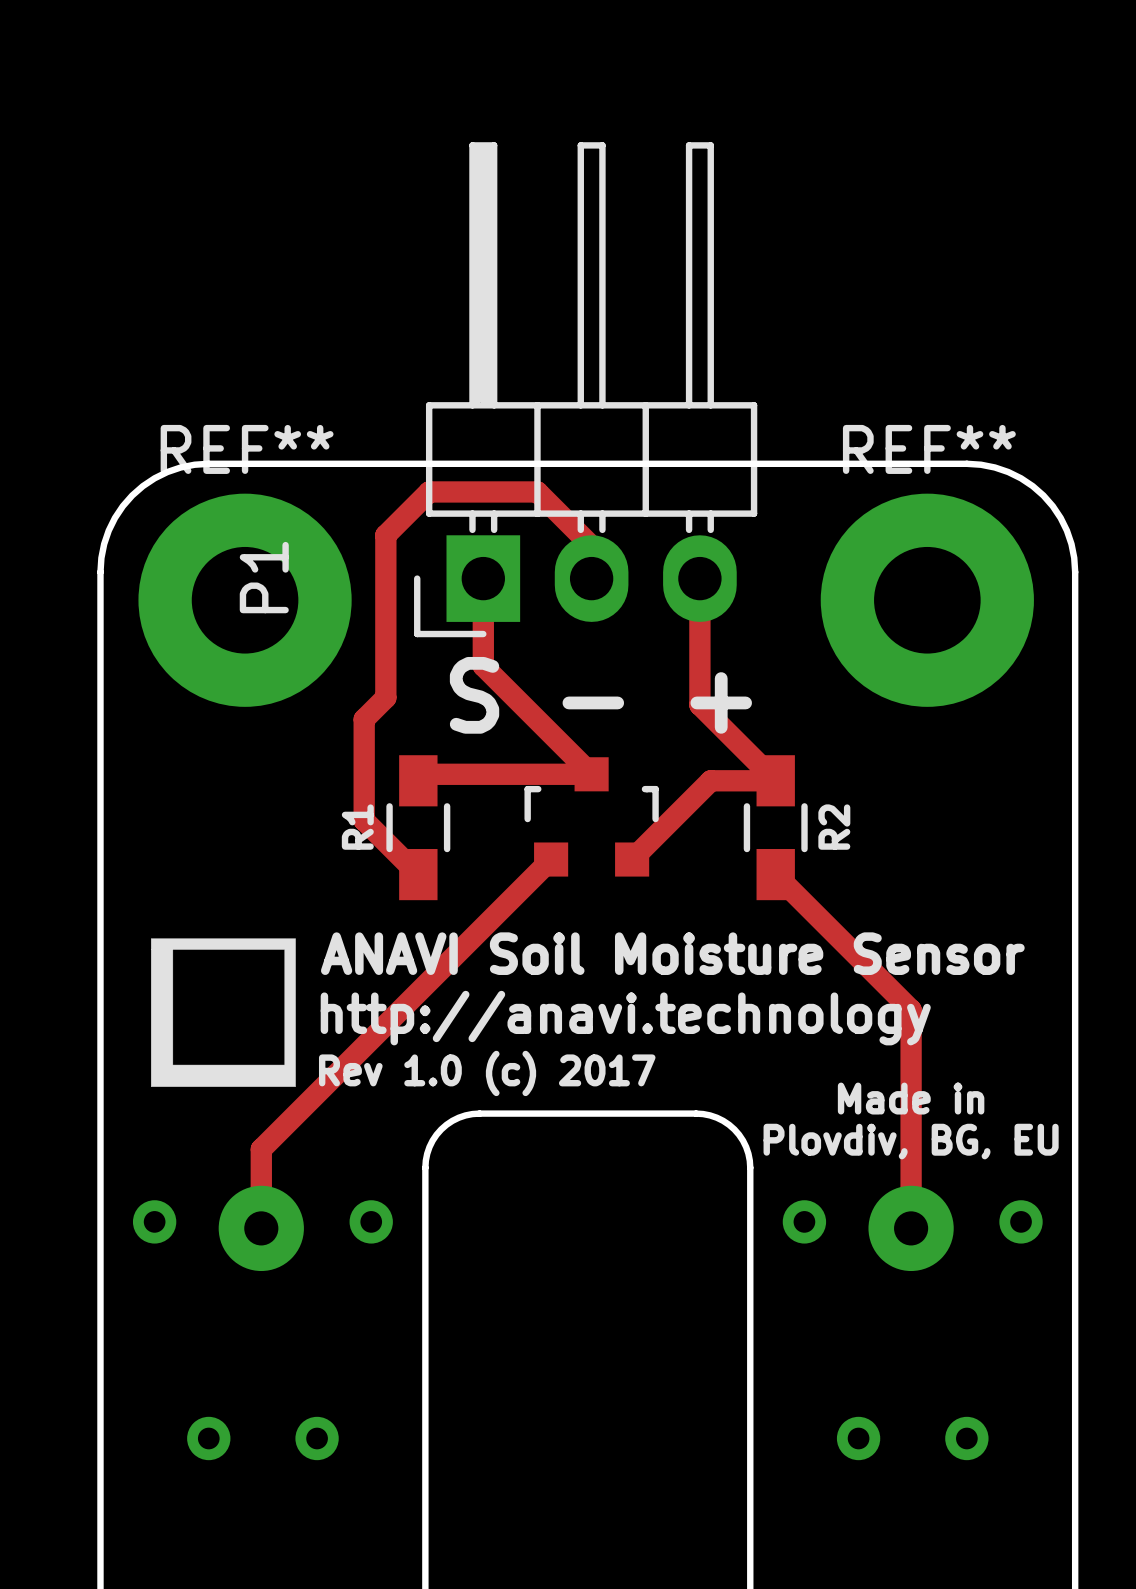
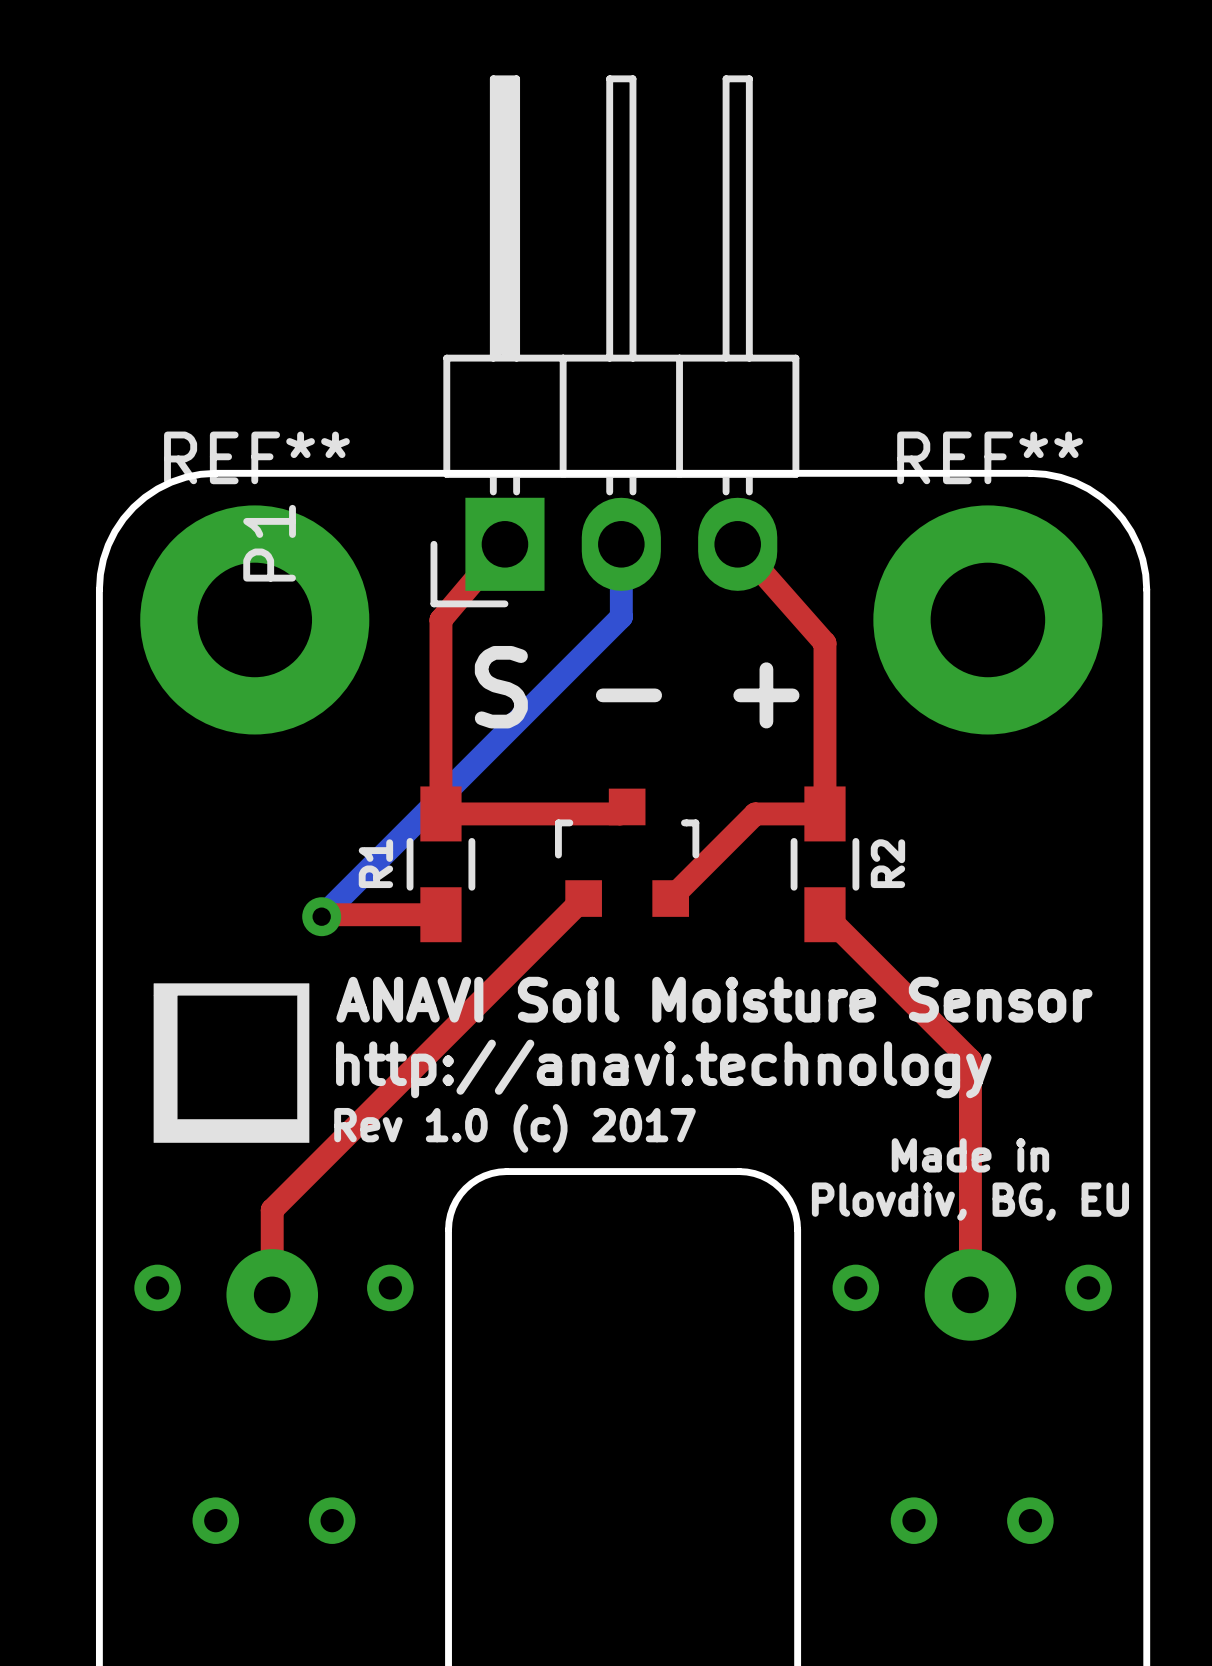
P1 position: (585, 389) -> (614, 341)
top track: none -> (504, 544) (440, 619) (440, 813) (620, 813) (627, 806)
bottom track: none -> (621, 544) (621, 617) (321, 916)
top track: (483, 578) (483, 665) (591, 774) (424, 774) -> none
top track: (591, 578) (591, 546) (537, 491) (429, 491) (385, 535) (385, 697) (364, 719) (364, 820) (418, 874) -> (321, 916) (323, 914) (440, 914)
top track: (699, 578) (699, 704) (775, 780) -> (737, 544) (824, 643) (824, 813)
text position: S - + (600, 695) -> S - + (637, 687)
via: none -> (321, 916)

